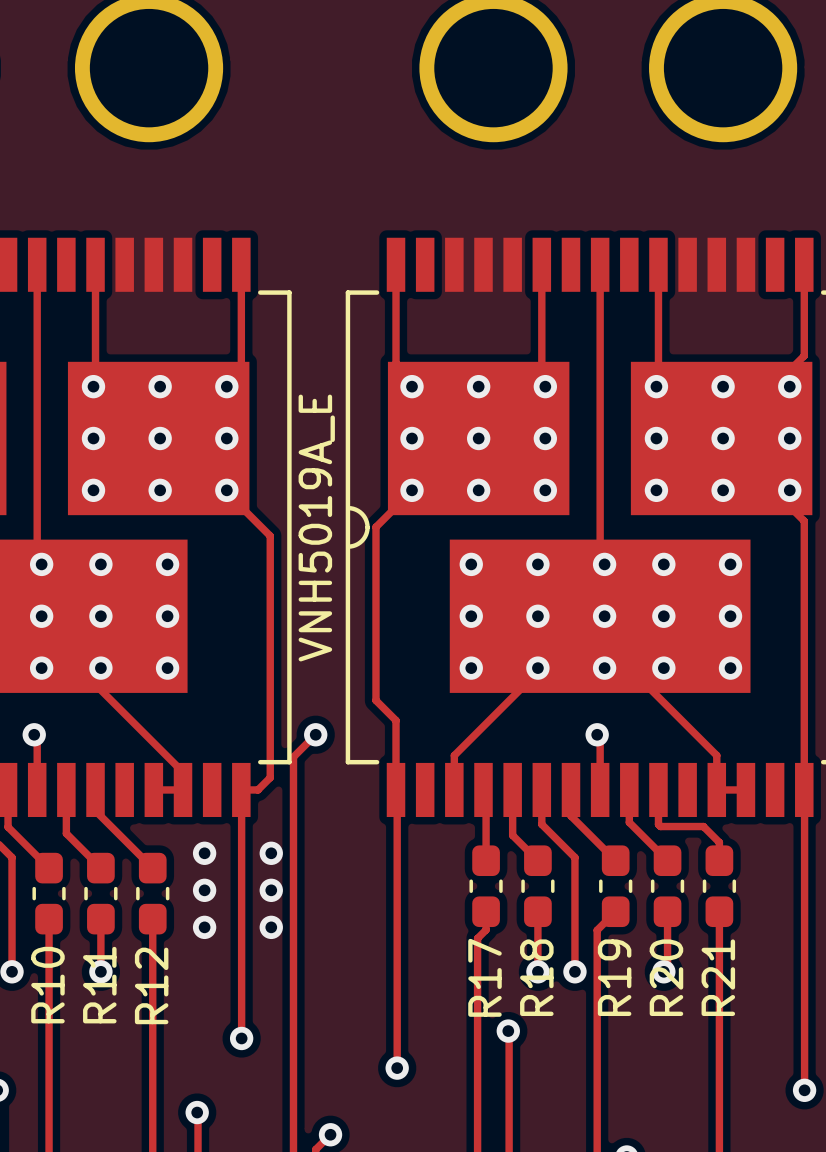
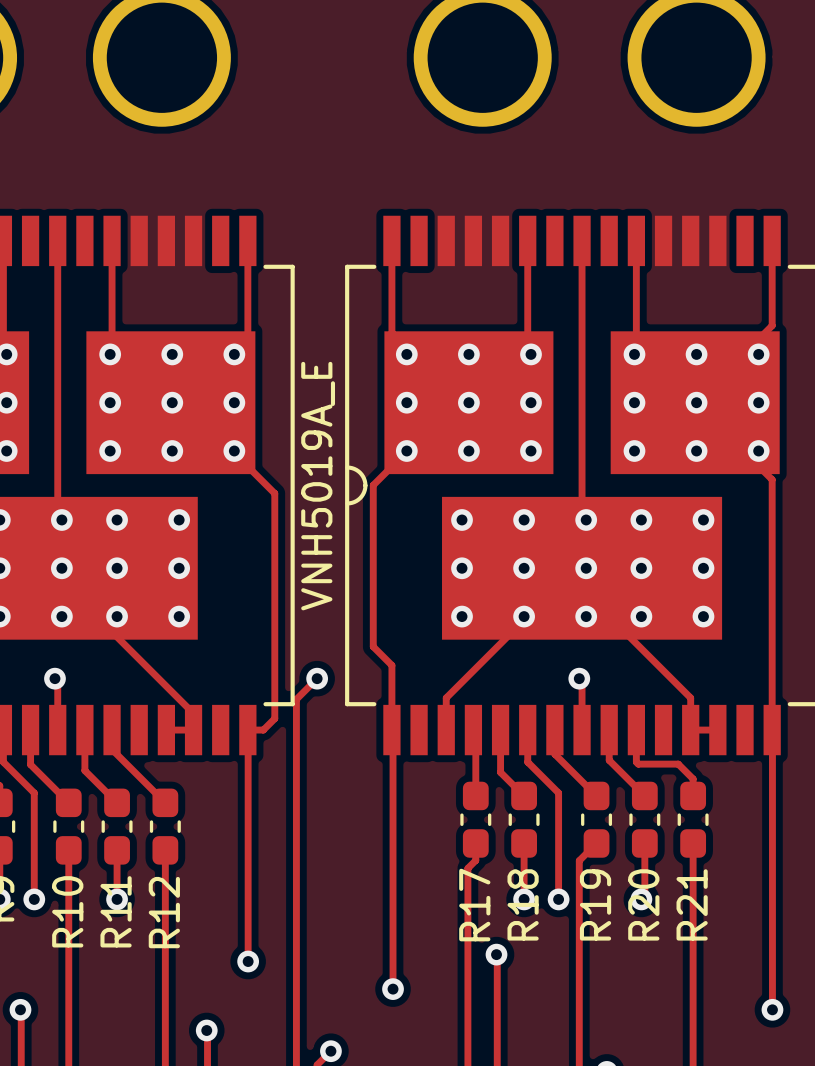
via: (204, 853) -> none
via: (271, 853) -> none
via: (204, 890) -> none
via: (271, 890) -> none
via: (204, 927) -> none
via: (271, 927) -> none

